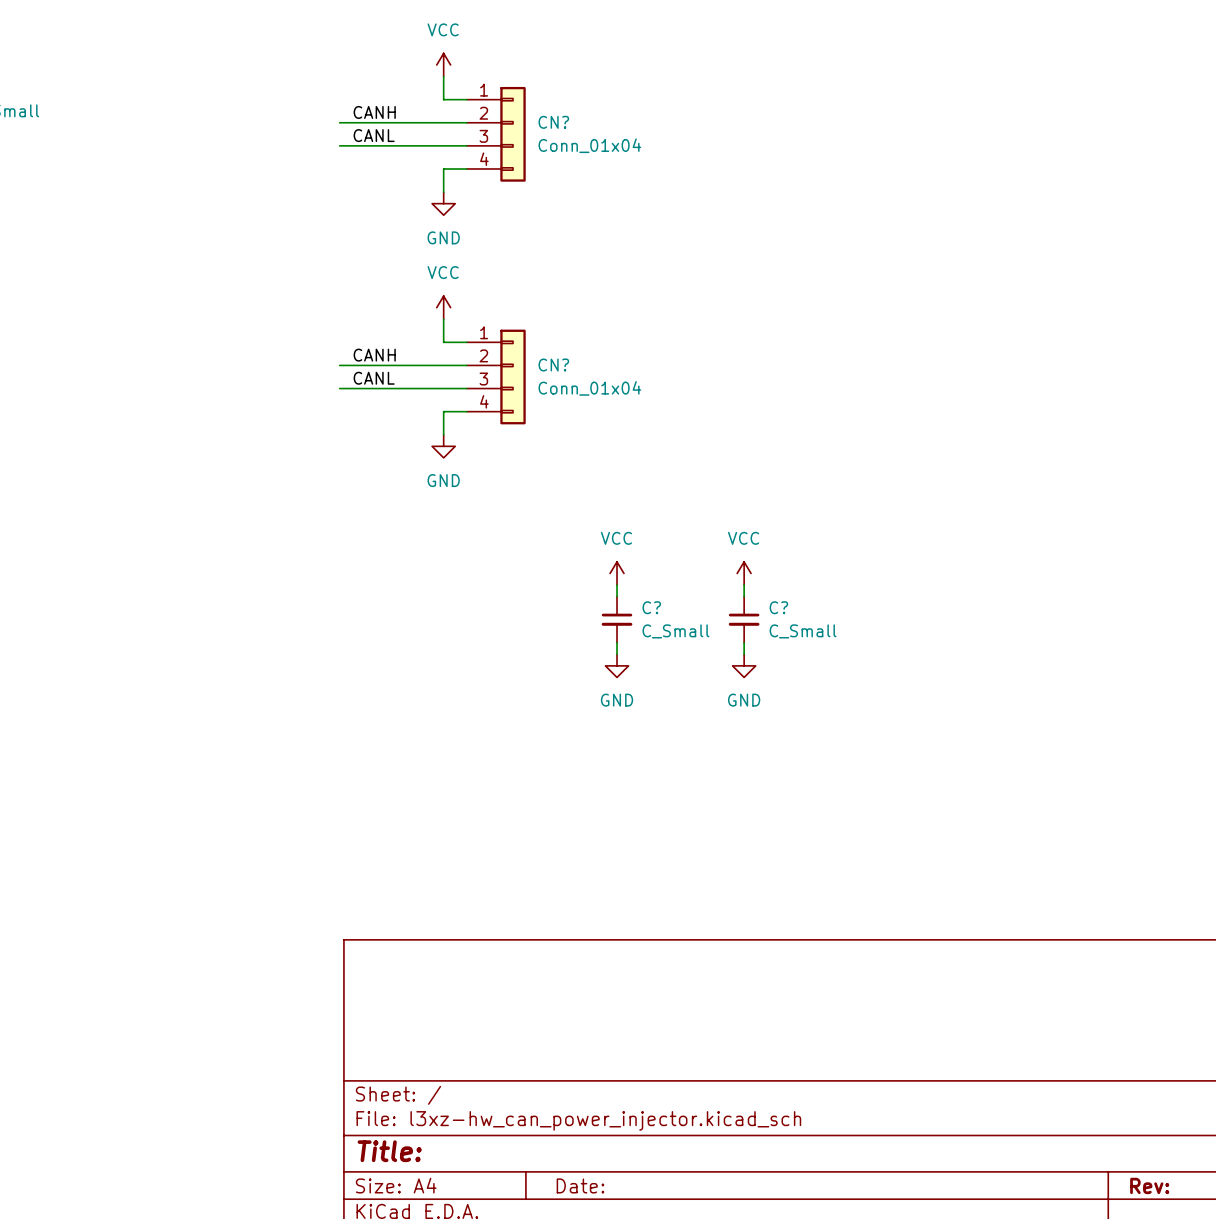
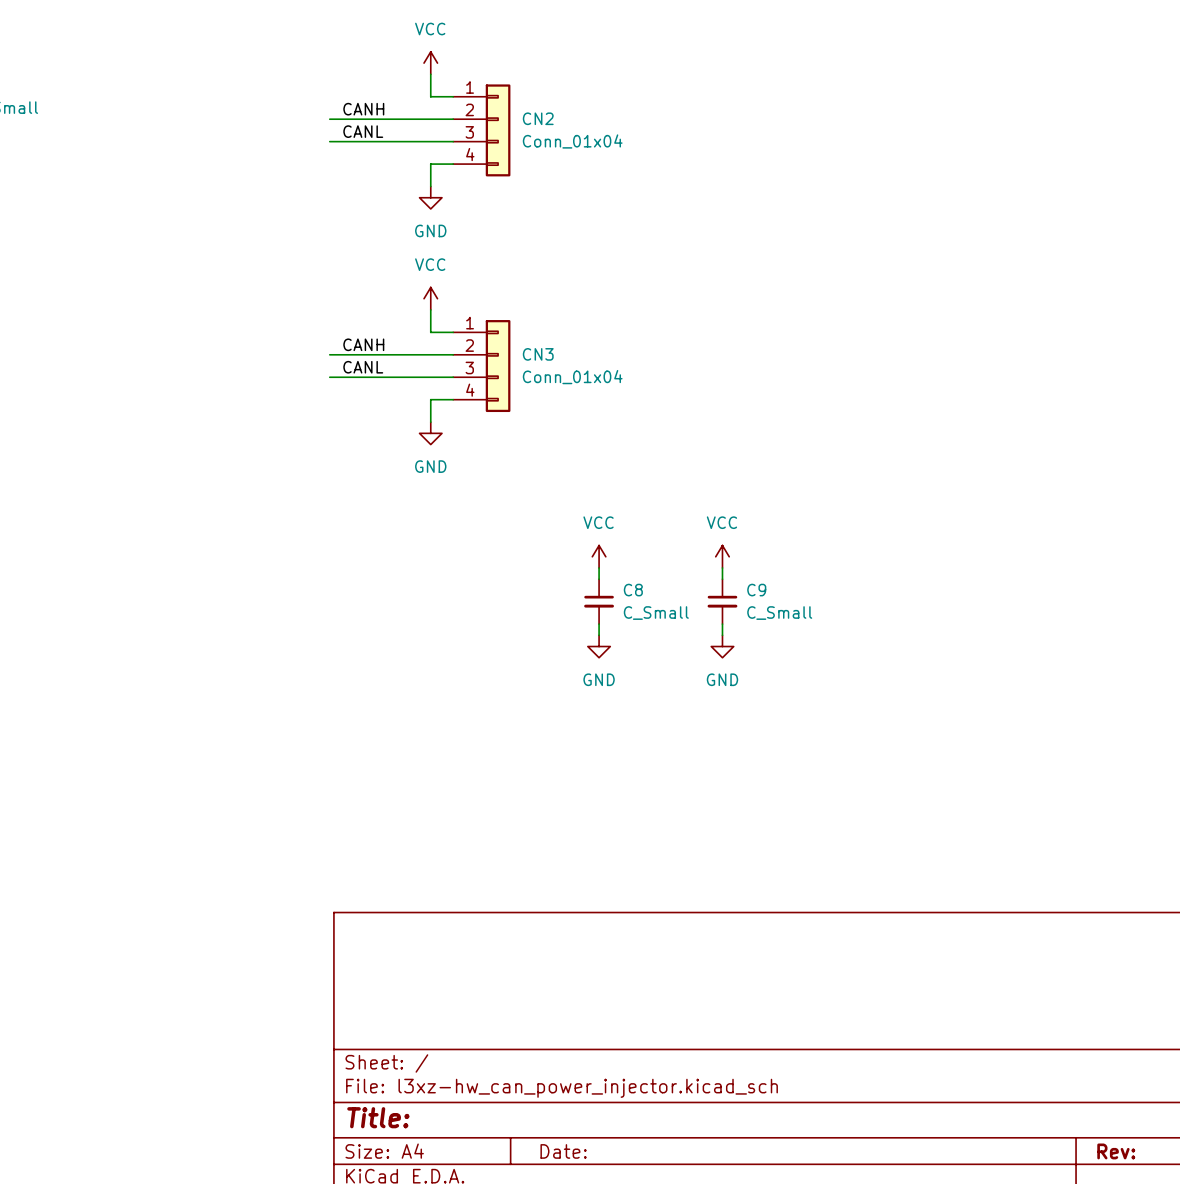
CN? name: CN? (553, 122) -> CN2 (538, 118)
CN? name: CN? (553, 365) -> CN3 (538, 354)
C? name: C? (651, 607) -> C8 (633, 590)
C? name: C? (778, 607) -> C9 (756, 590)

